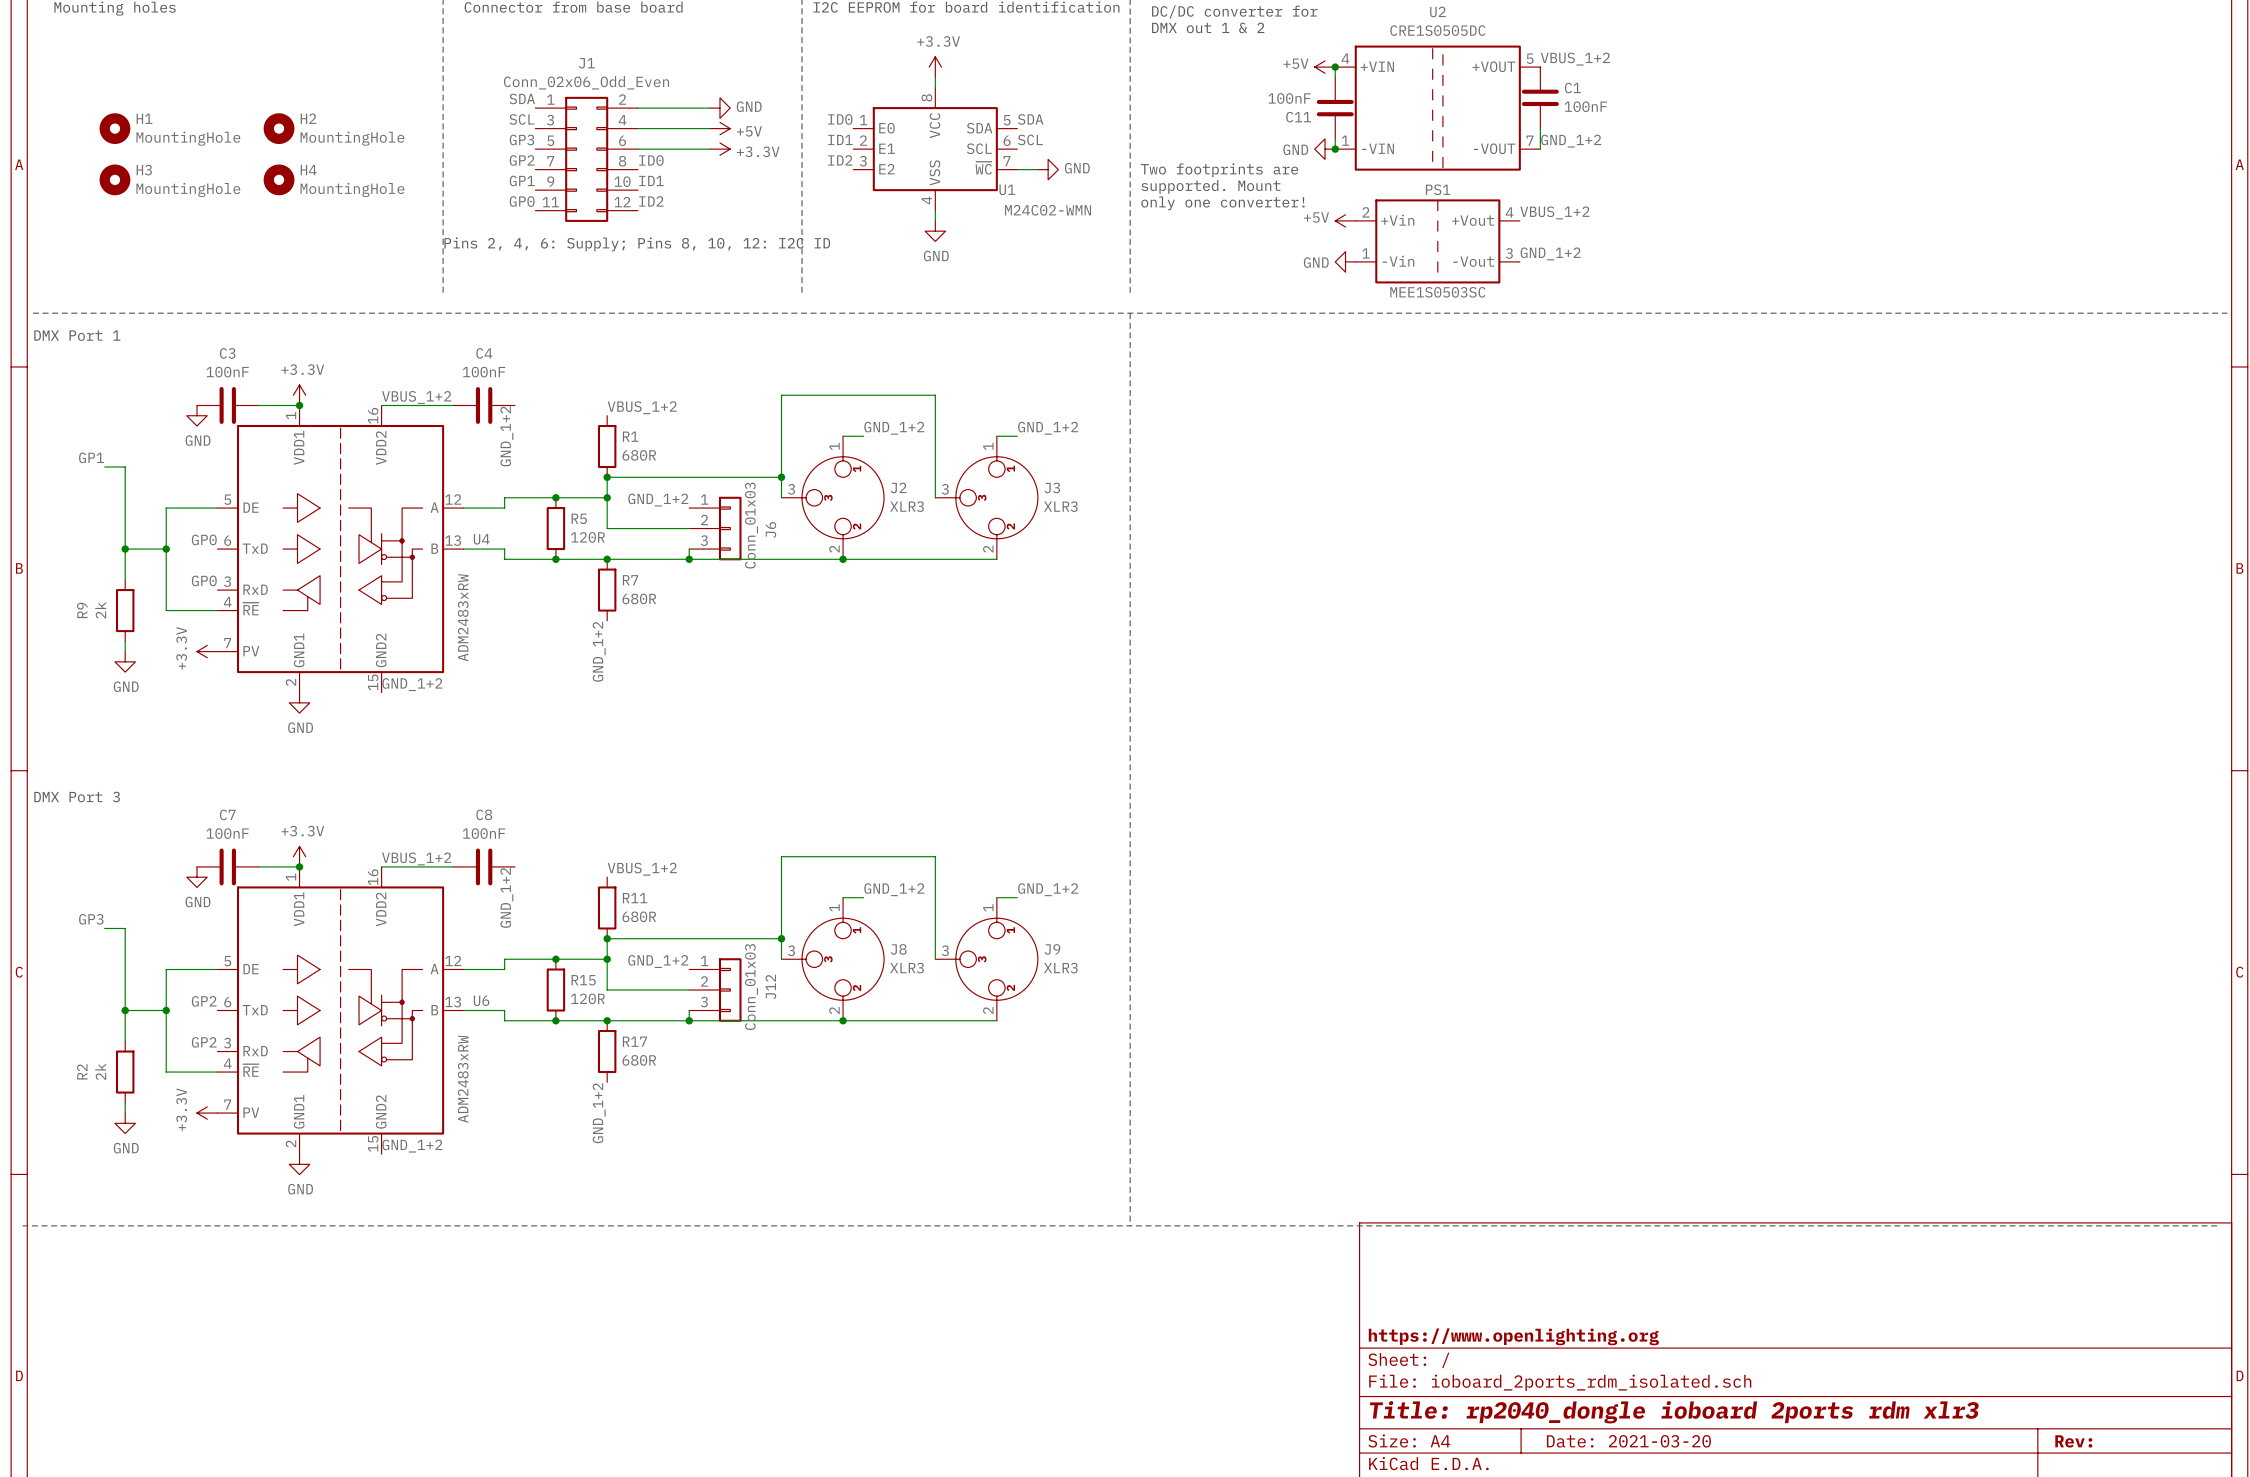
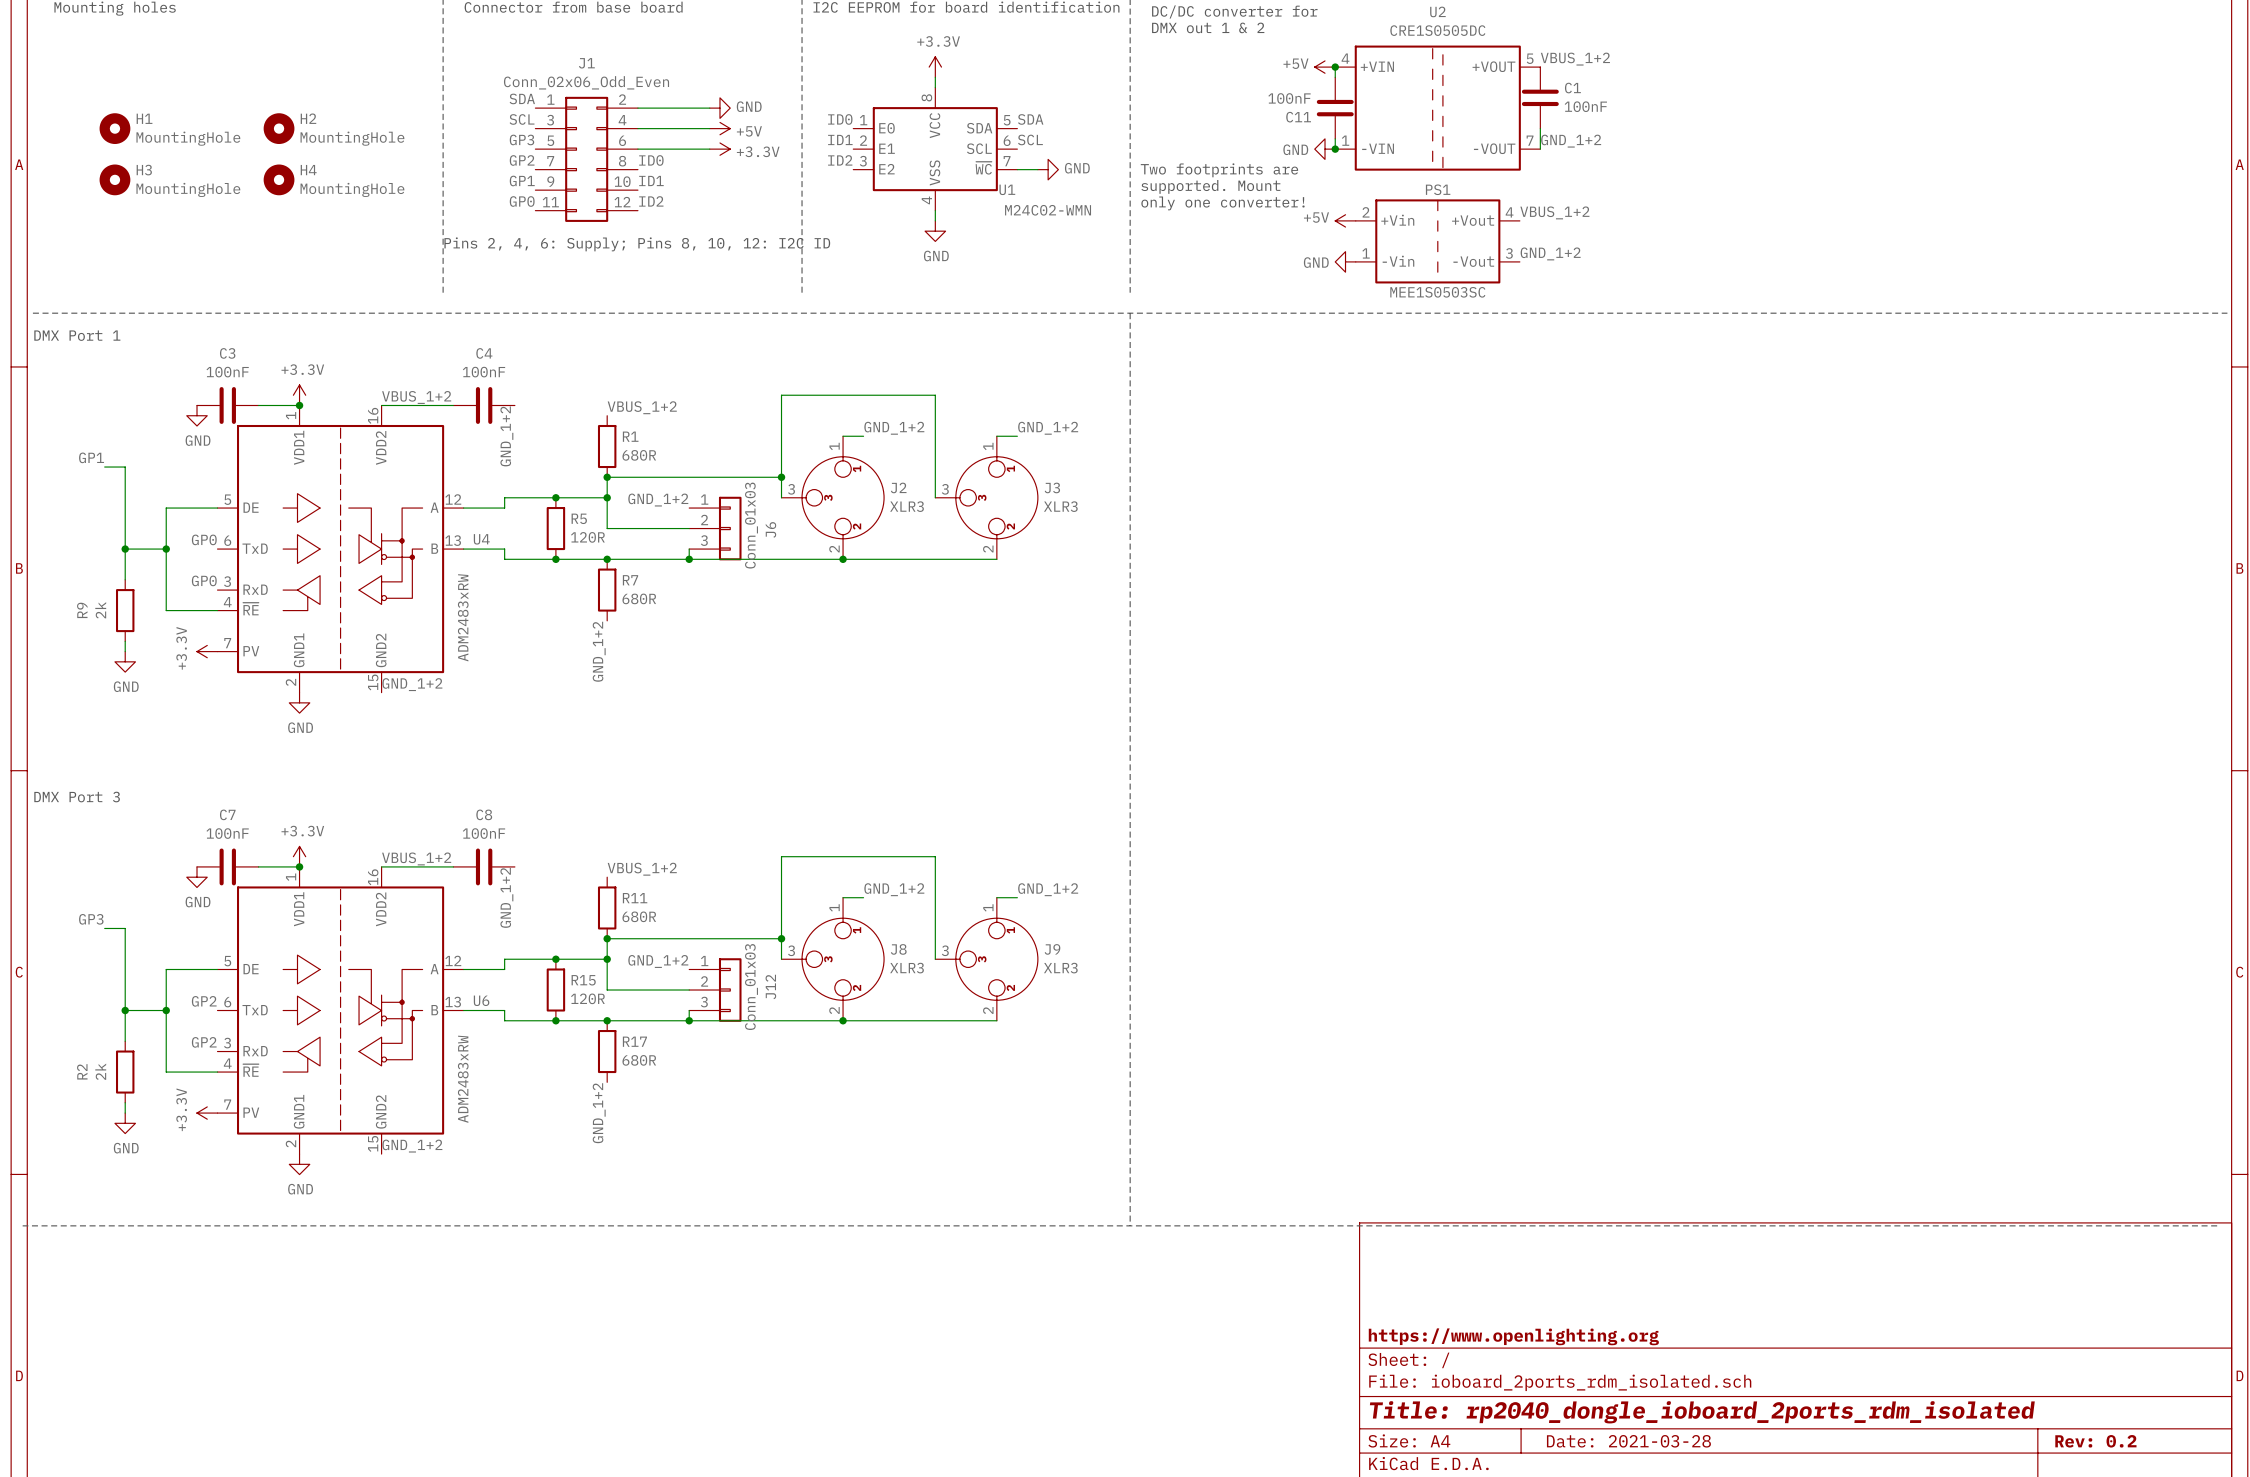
title block: Title: rp2040_dongle ioboard 2ports rdm xlr3 (1674, 1412) -> Title: rp2040_dongle_ioboard_2ports_rdm_isolated (1702, 1412)
title block: Date: 2021-03-20 (1628, 1441) -> Date: 2021-03-28 (1628, 1441)
title block: Rev: (2073, 1441) -> Rev: 0.2 (2095, 1441)

